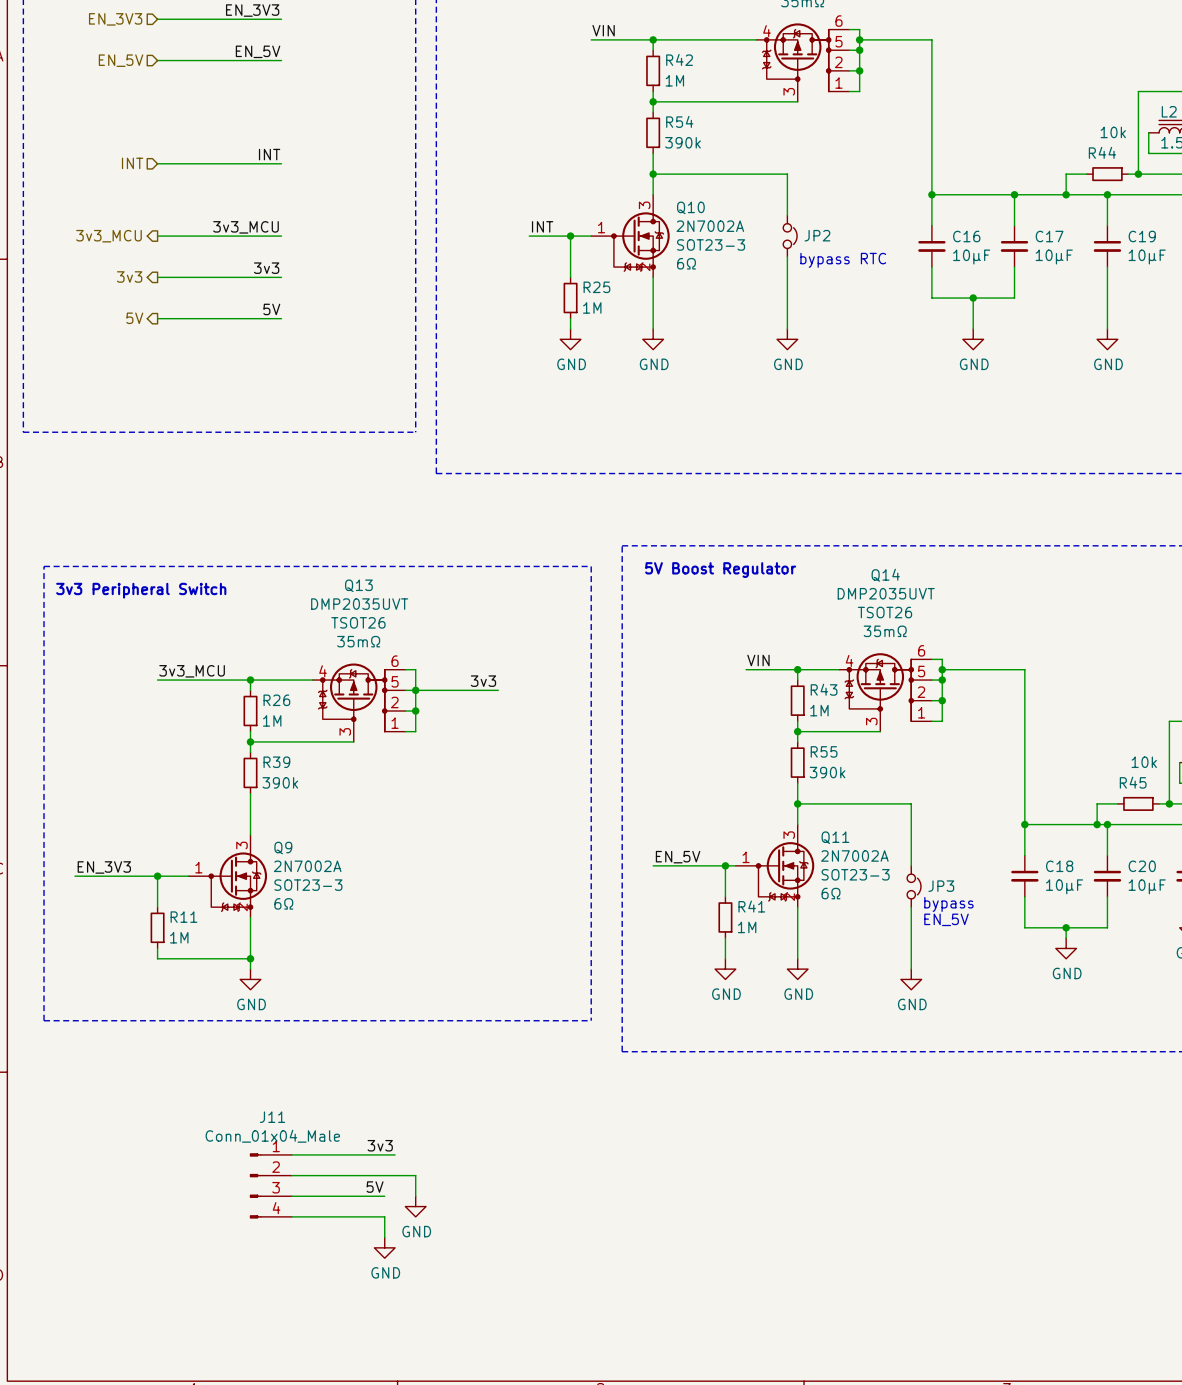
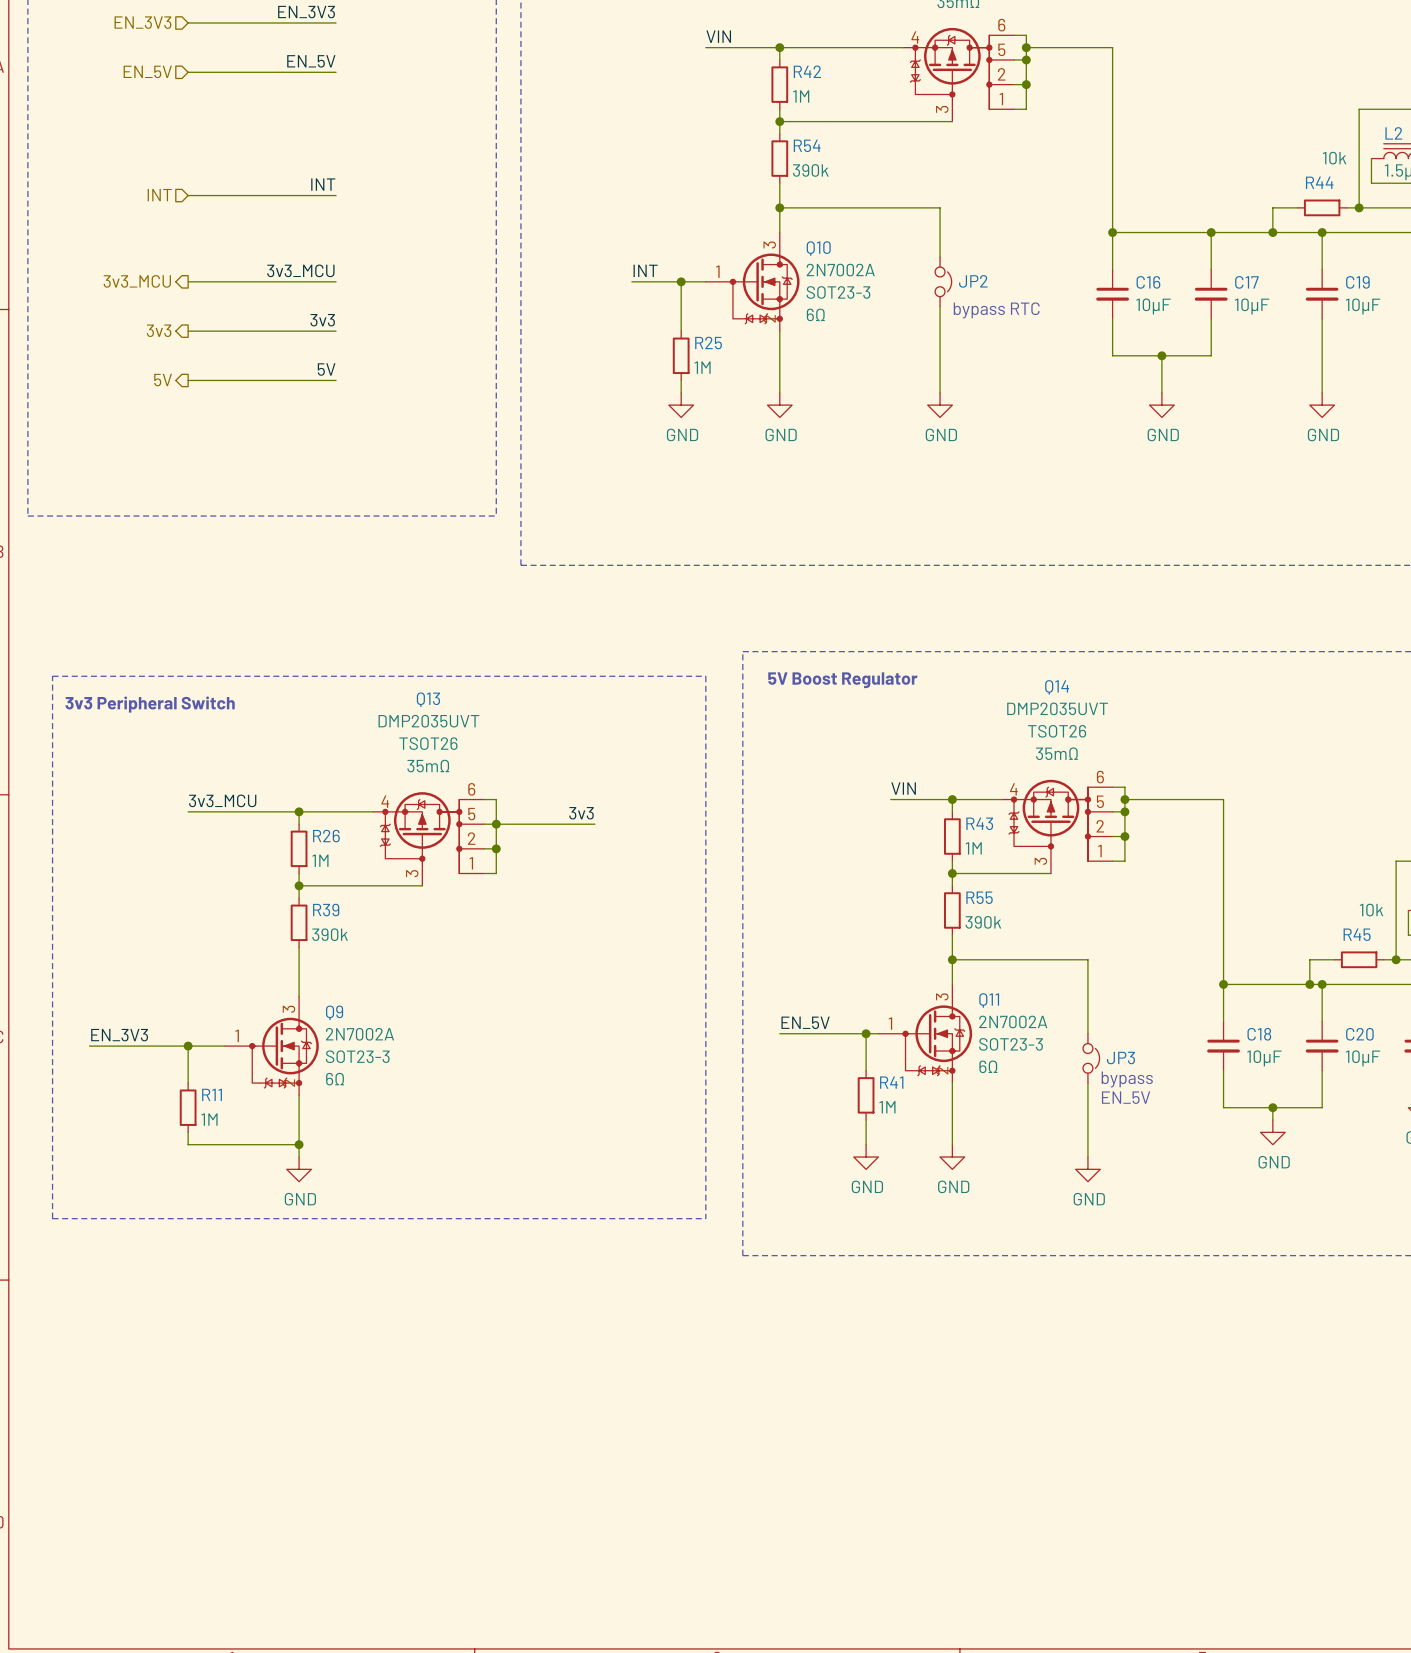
label: 3v3 (380, 1145) -> none
wire: (291, 1154) (395, 1154) -> none
wire: (291, 1175) (415, 1175) (415, 1196) -> none
J11: Conn_01x04_Male (270, 1185) -> none
label: 5V (375, 1187) -> none
wire: (291, 1196) (384, 1196) -> none
power symbol: GND (415, 1206) -> none
wire: (291, 1216) (384, 1216) (384, 1237) -> none
power symbol: GND (384, 1247) -> none

